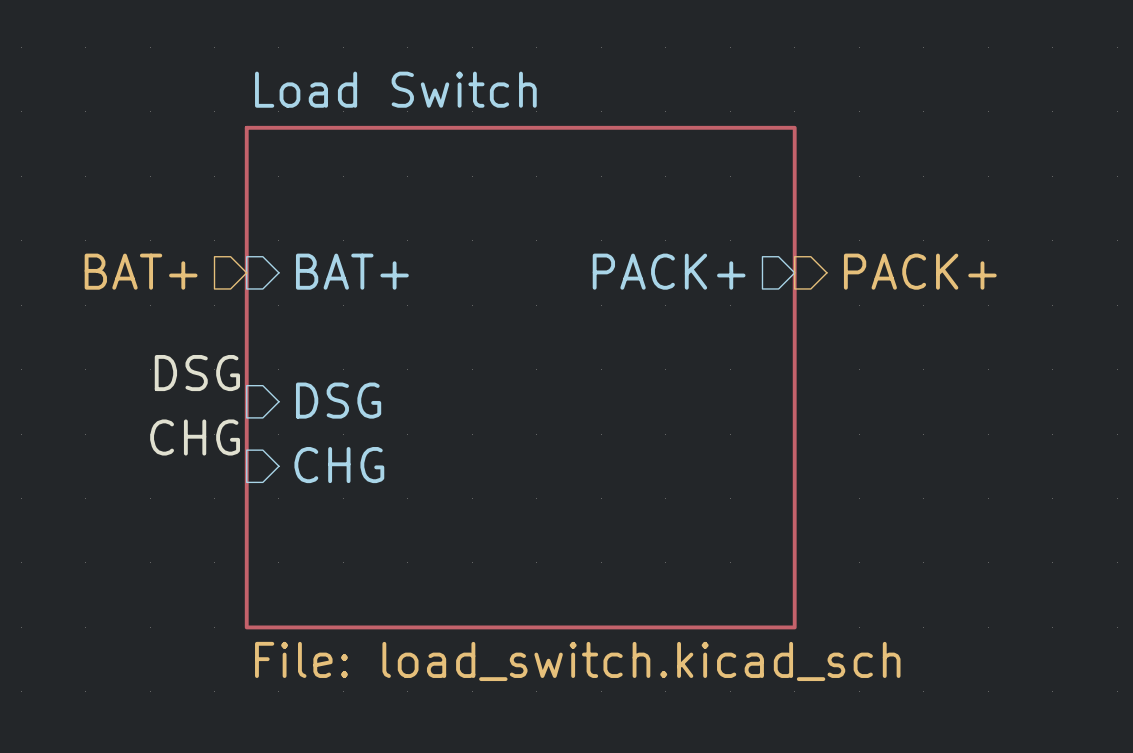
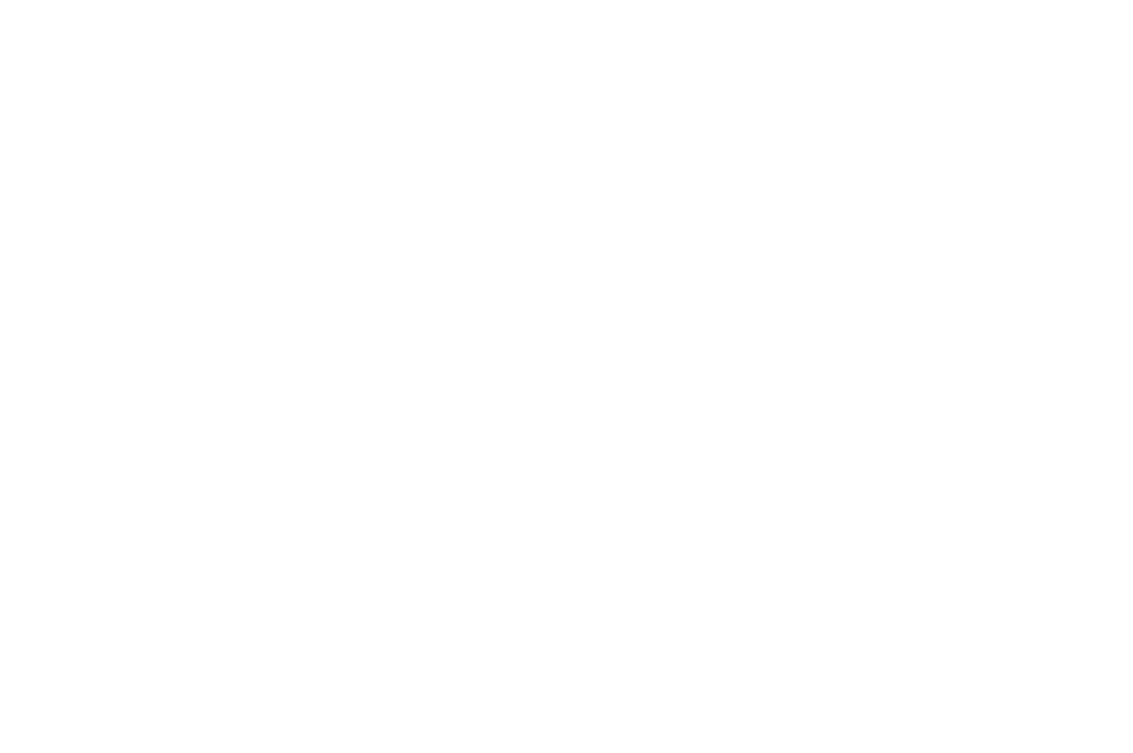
hierarchical label: BAT+ (141, 271) -> none
sheet pin: BAT+ (352, 271) -> none
sheet pin: PACK+ (669, 271) -> none
hierarchical label: PACK+ (920, 271) -> none
label: DSG (197, 373) -> none
sheet Load Switch: File: load_switch.kicad_sch (520, 377) -> none
sheet pin: DSG (338, 400) -> none
label: CHG (195, 437) -> none
sheet pin: CHG (339, 465) -> none

